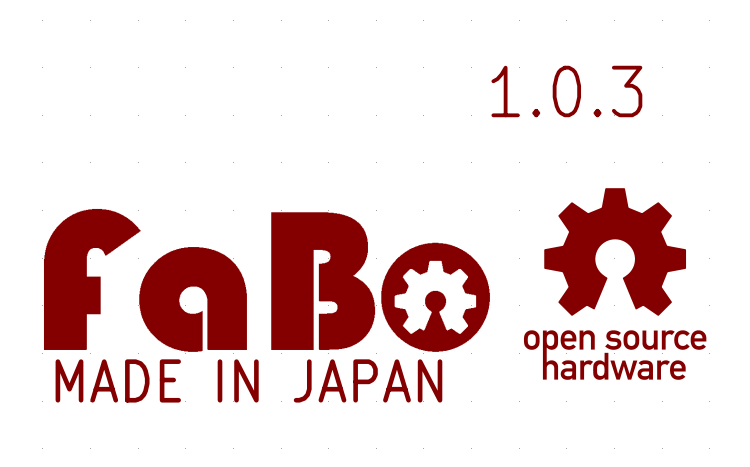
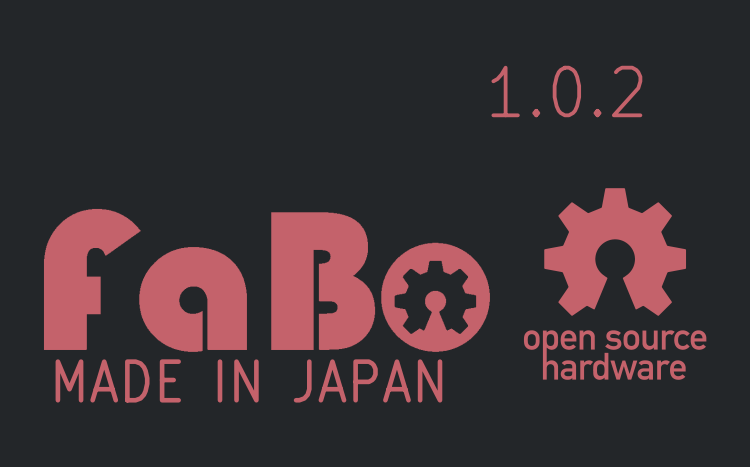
text: 1.0.3 (566, 91) -> 1.0.2 (566, 91)

